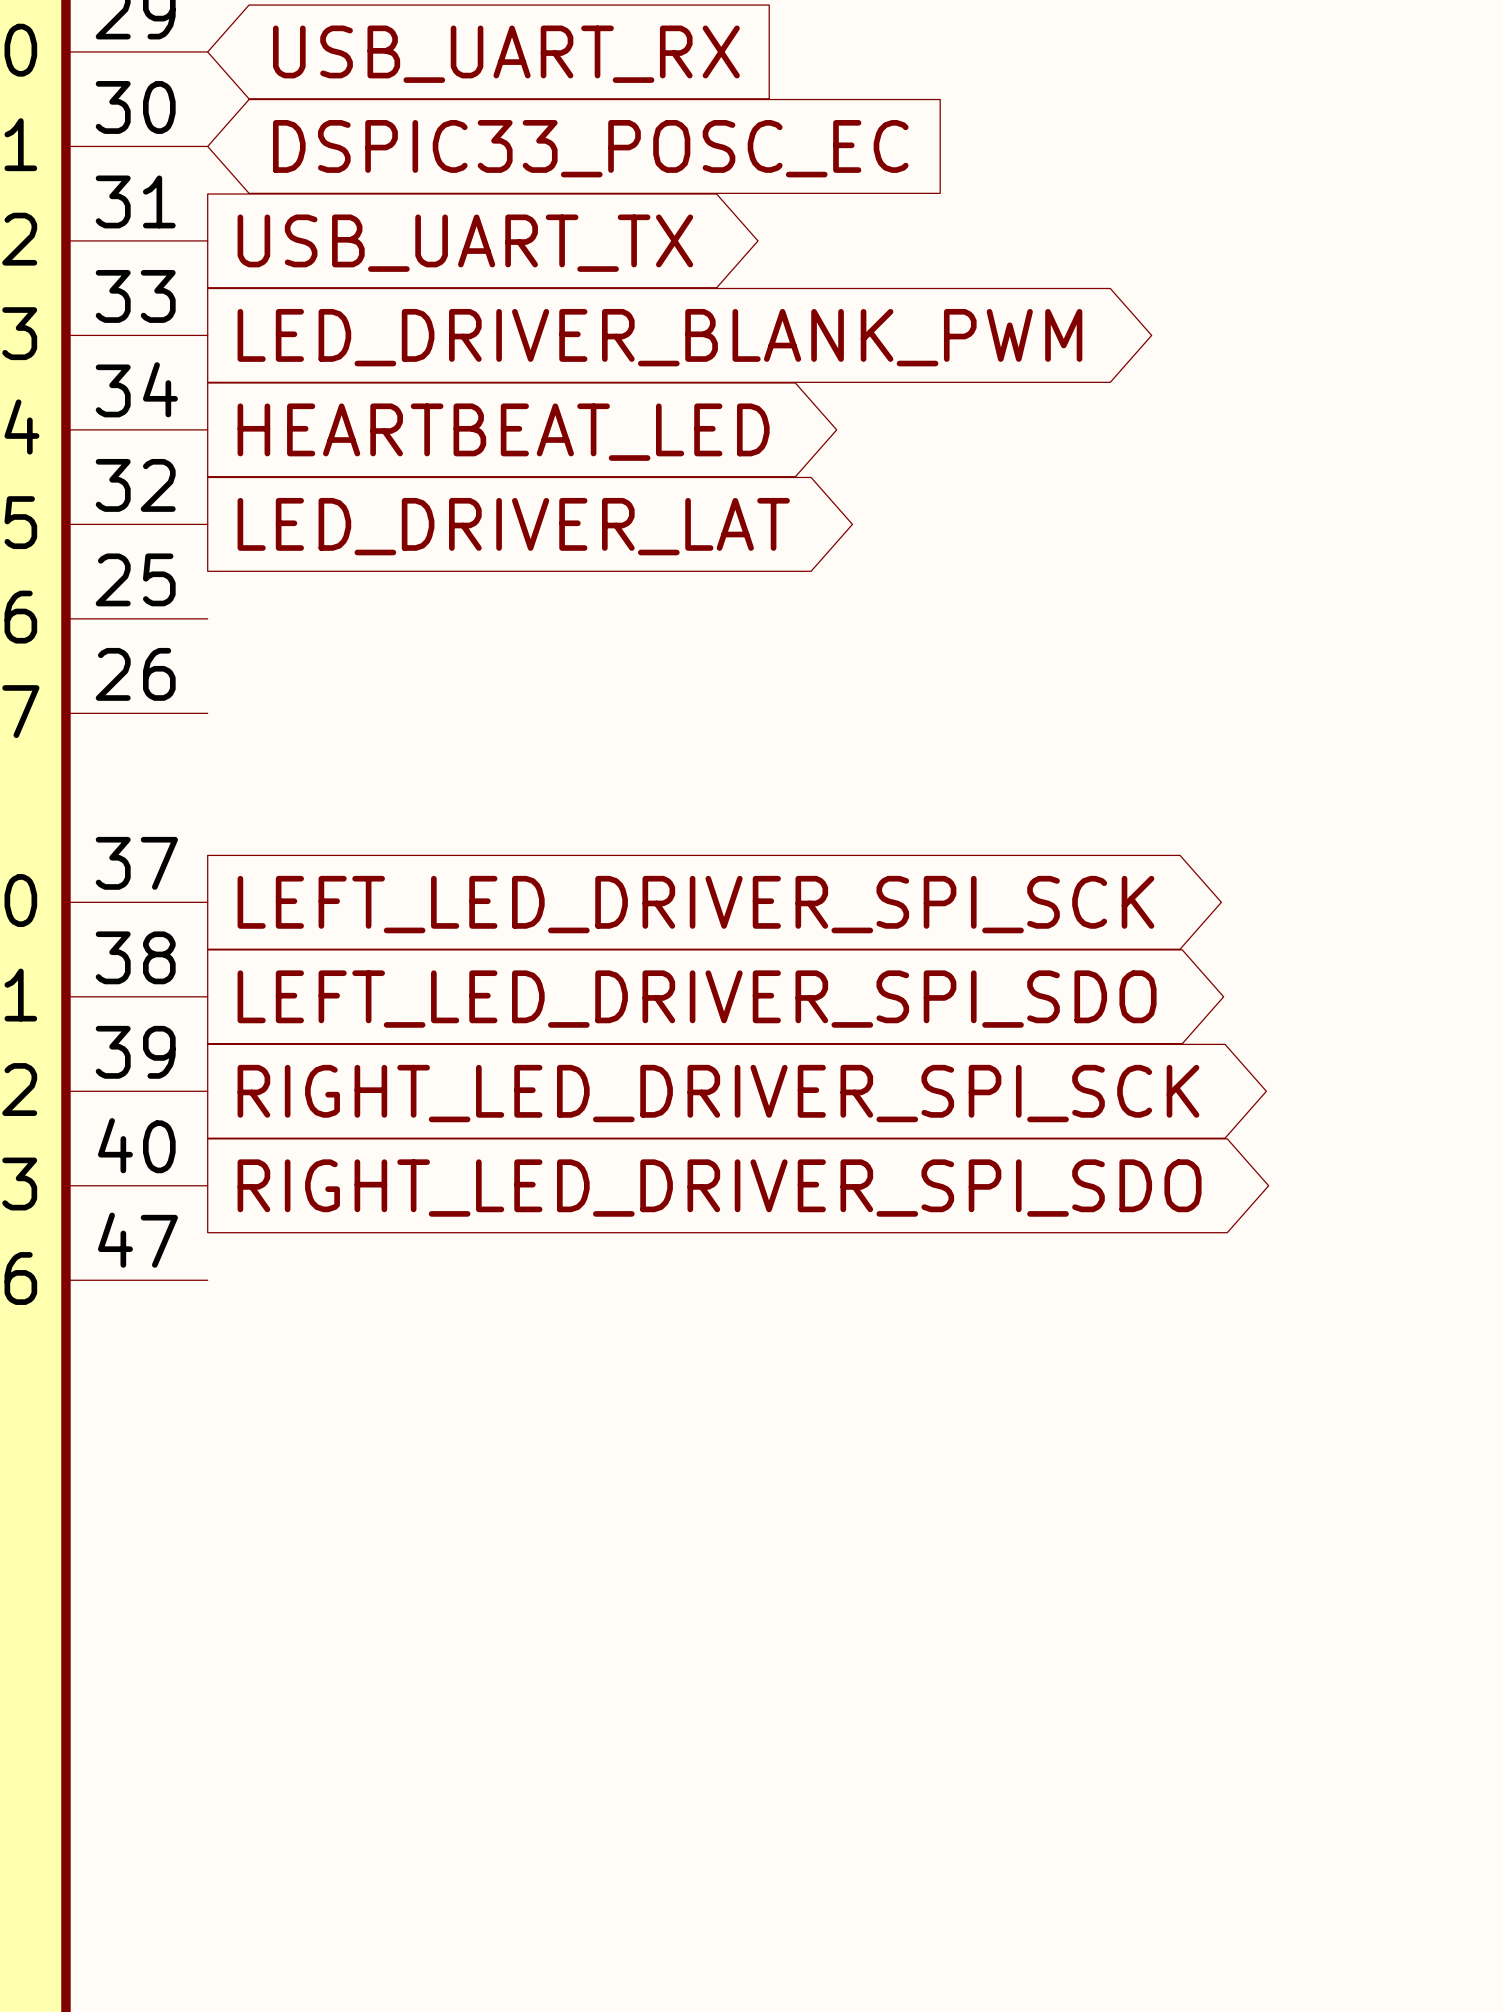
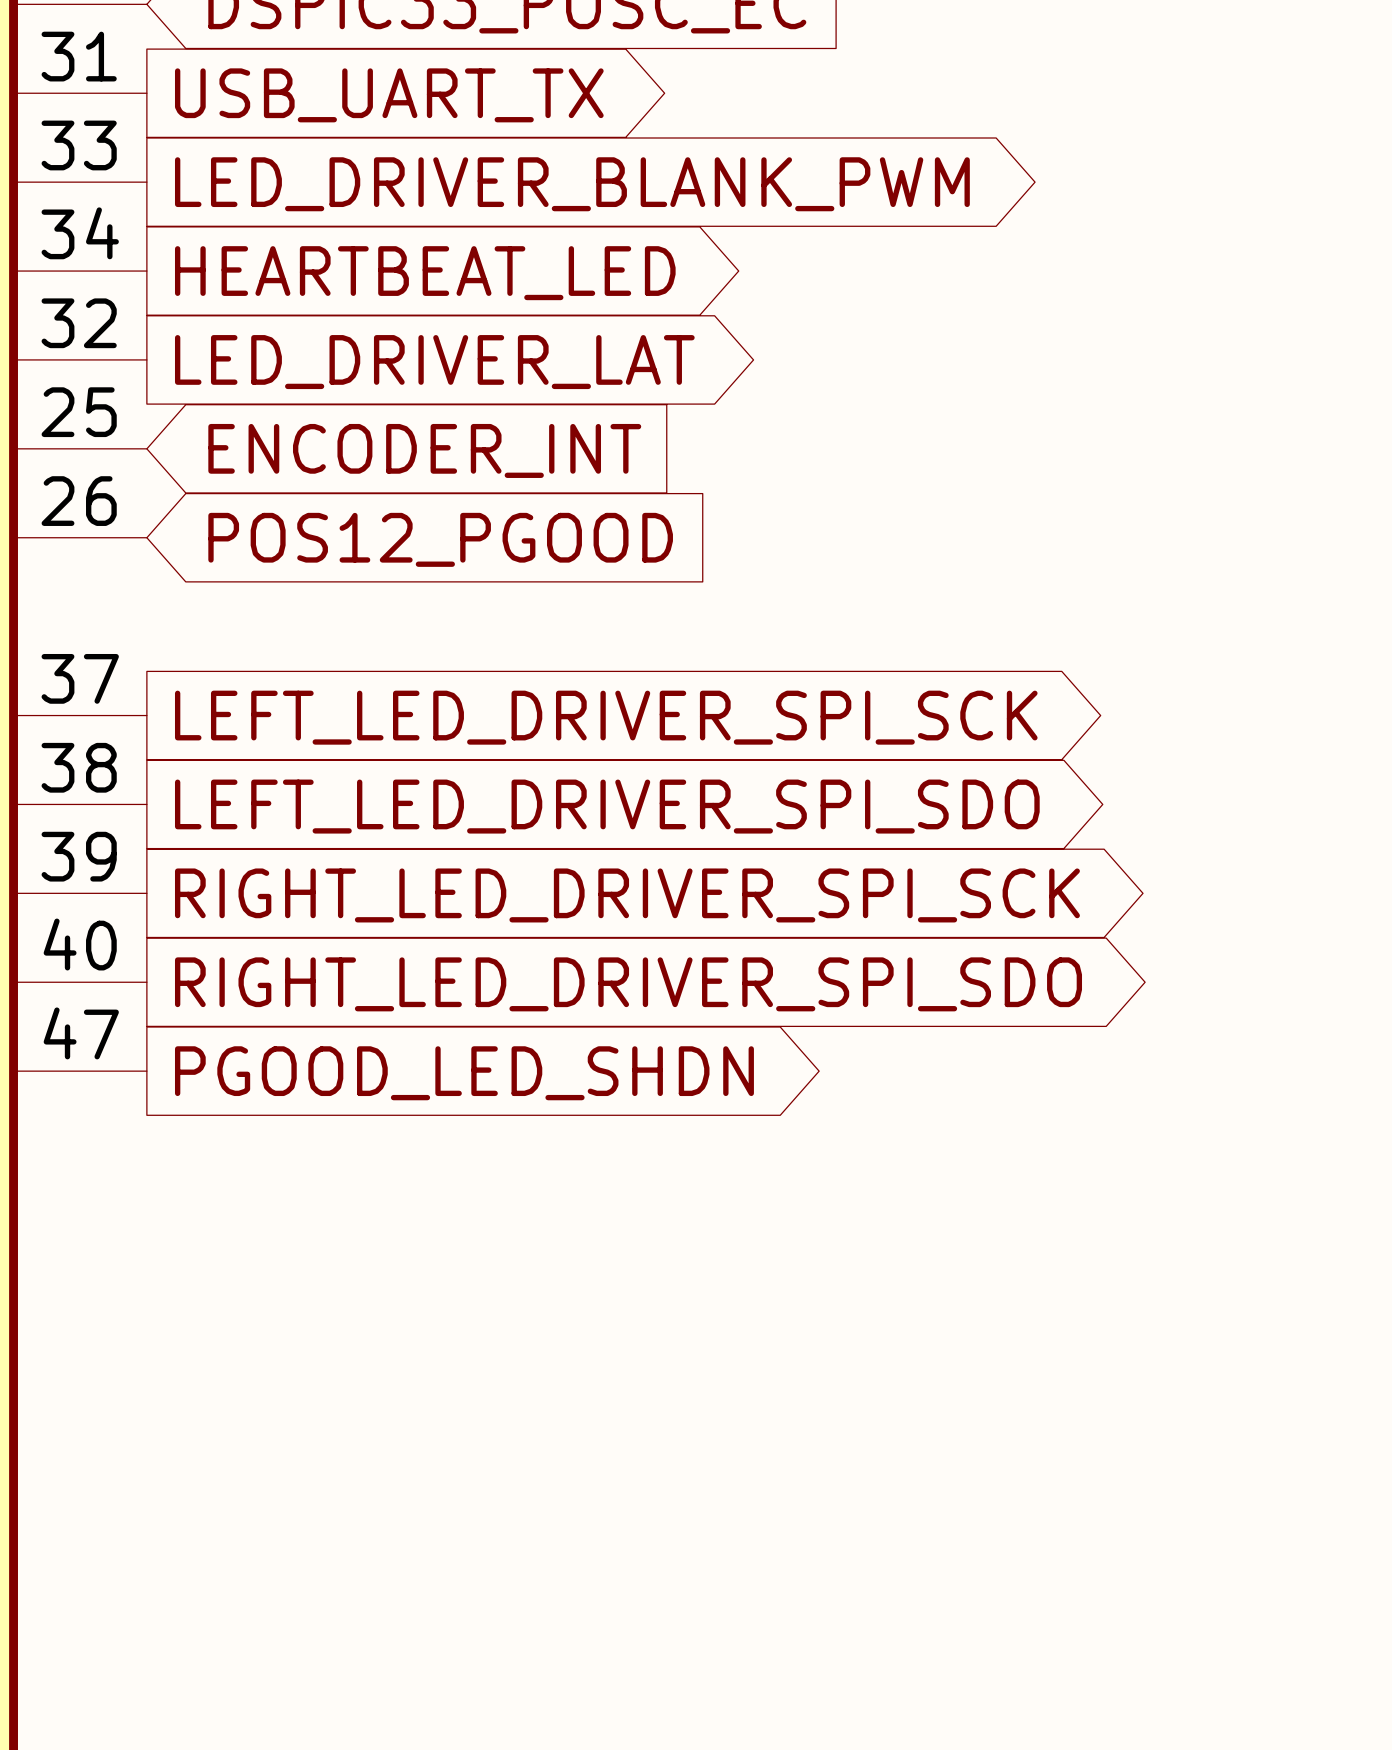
global label: none -> ENCODER_INT (424, 450)
global label: none -> POS12_PGOOD (440, 539)
global label: none -> PGOOD_LED_SHDN (464, 1073)

